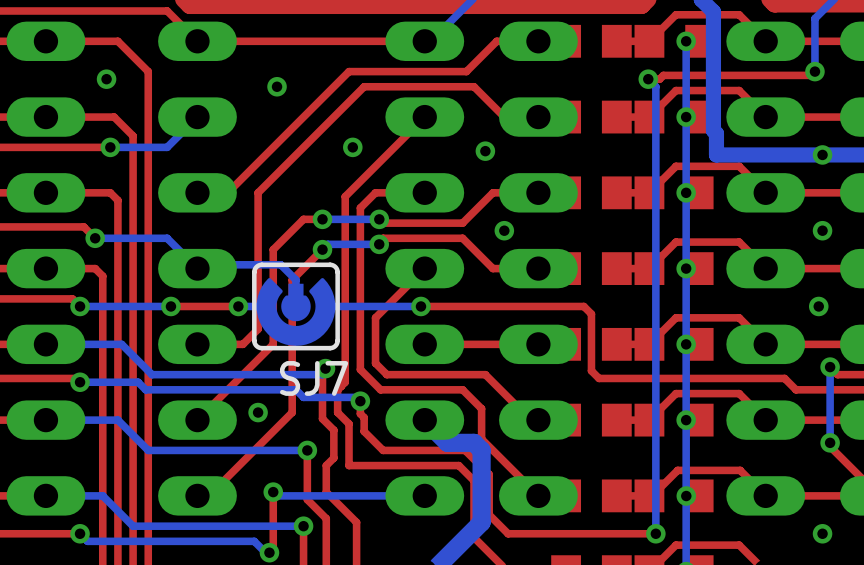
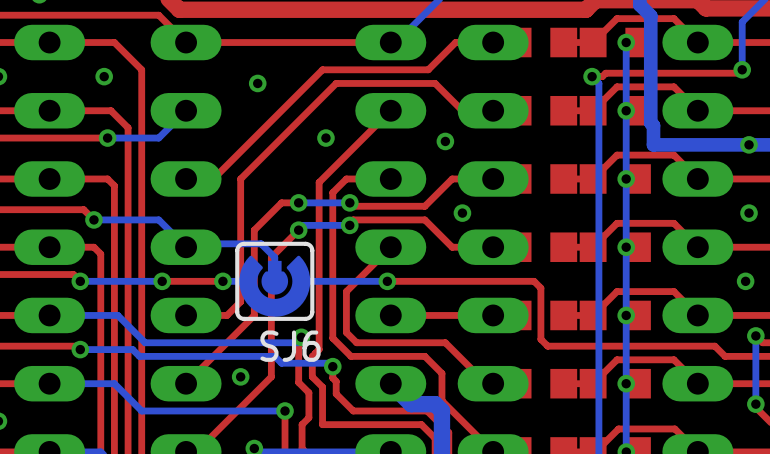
SJ7 name: SJ7 (314, 378) -> SJ6 (290, 346)

